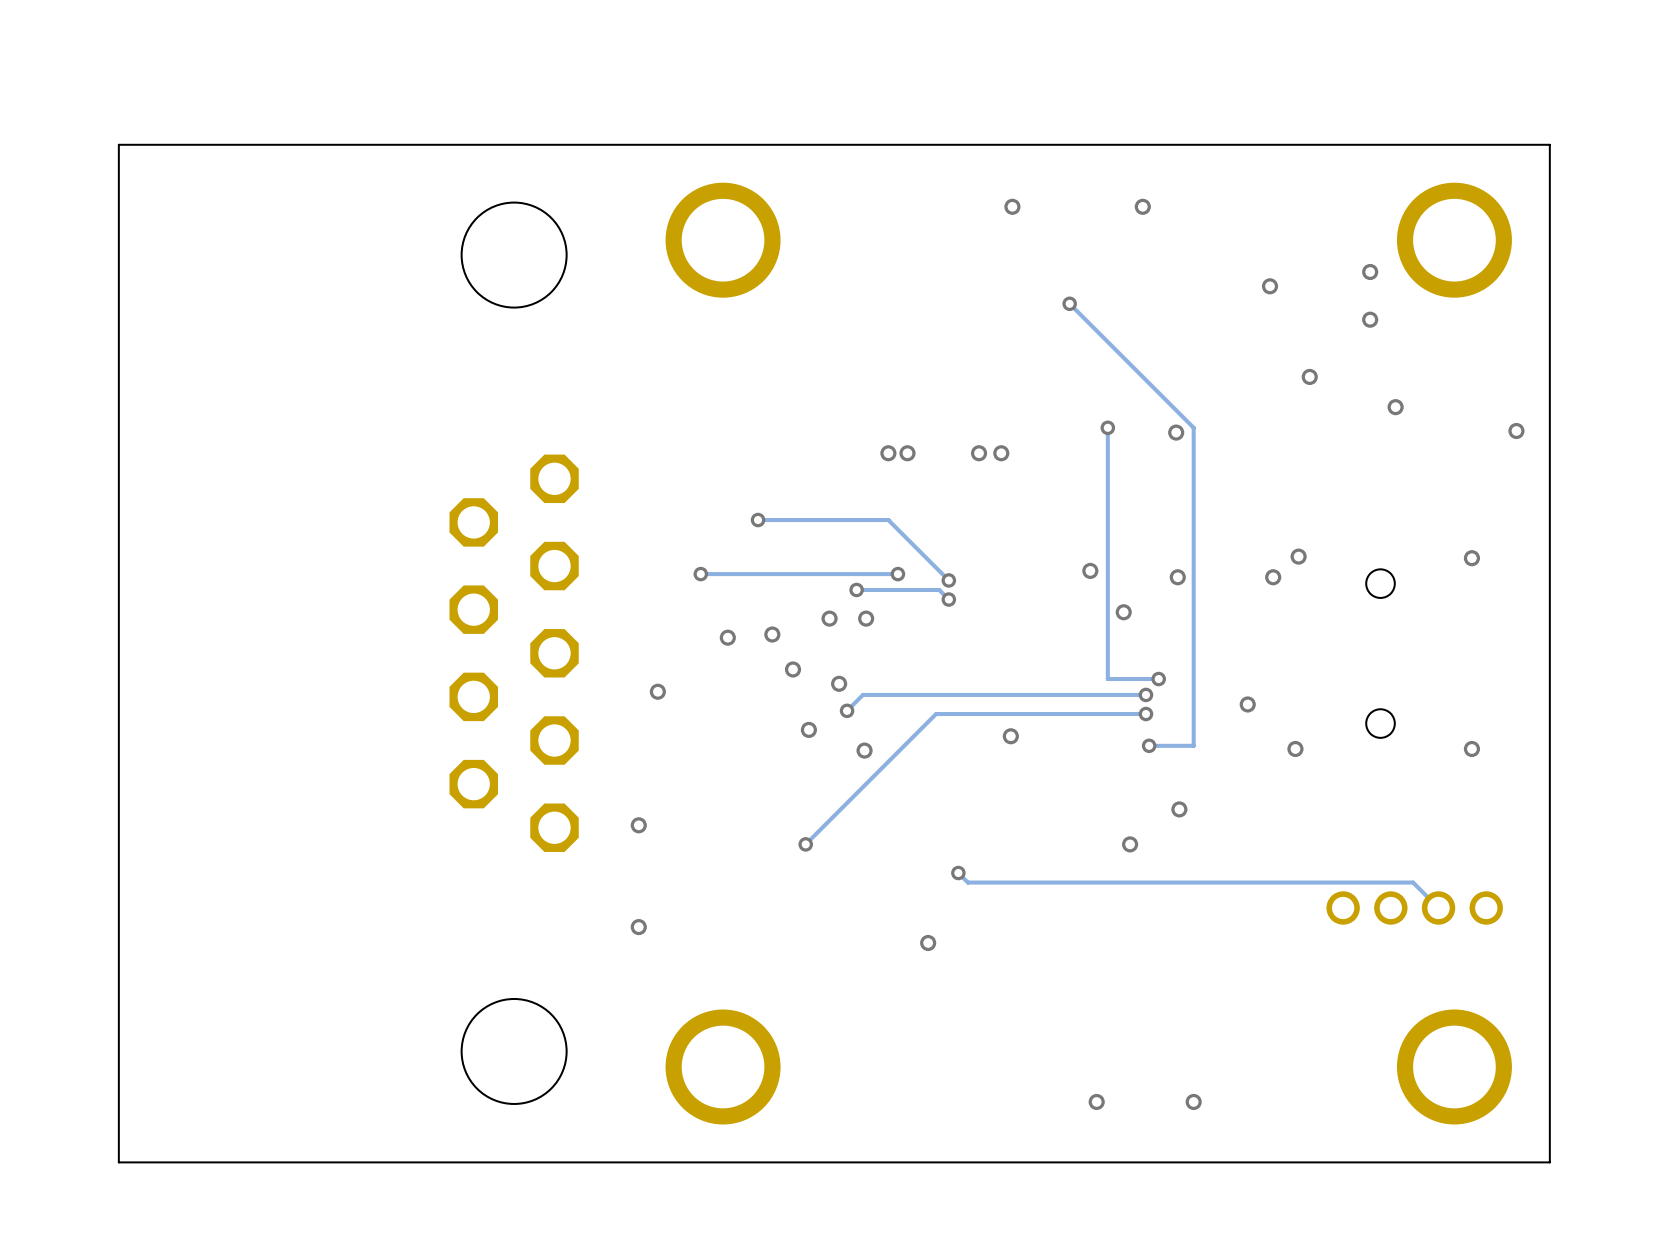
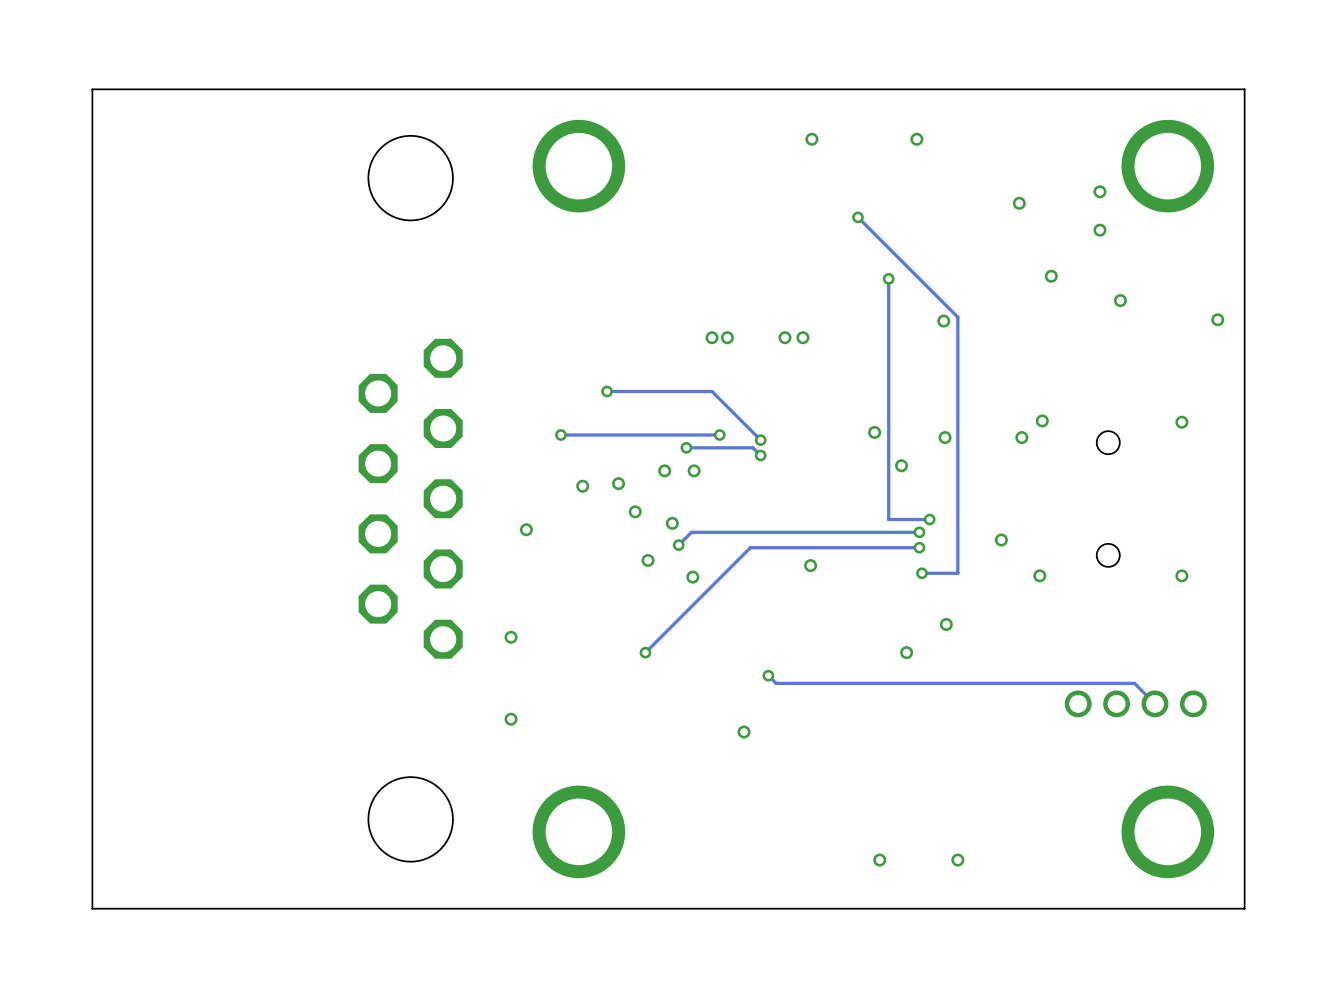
track: none -> (888, 278) (888, 317)
via position: (1107, 427) -> (888, 278)

